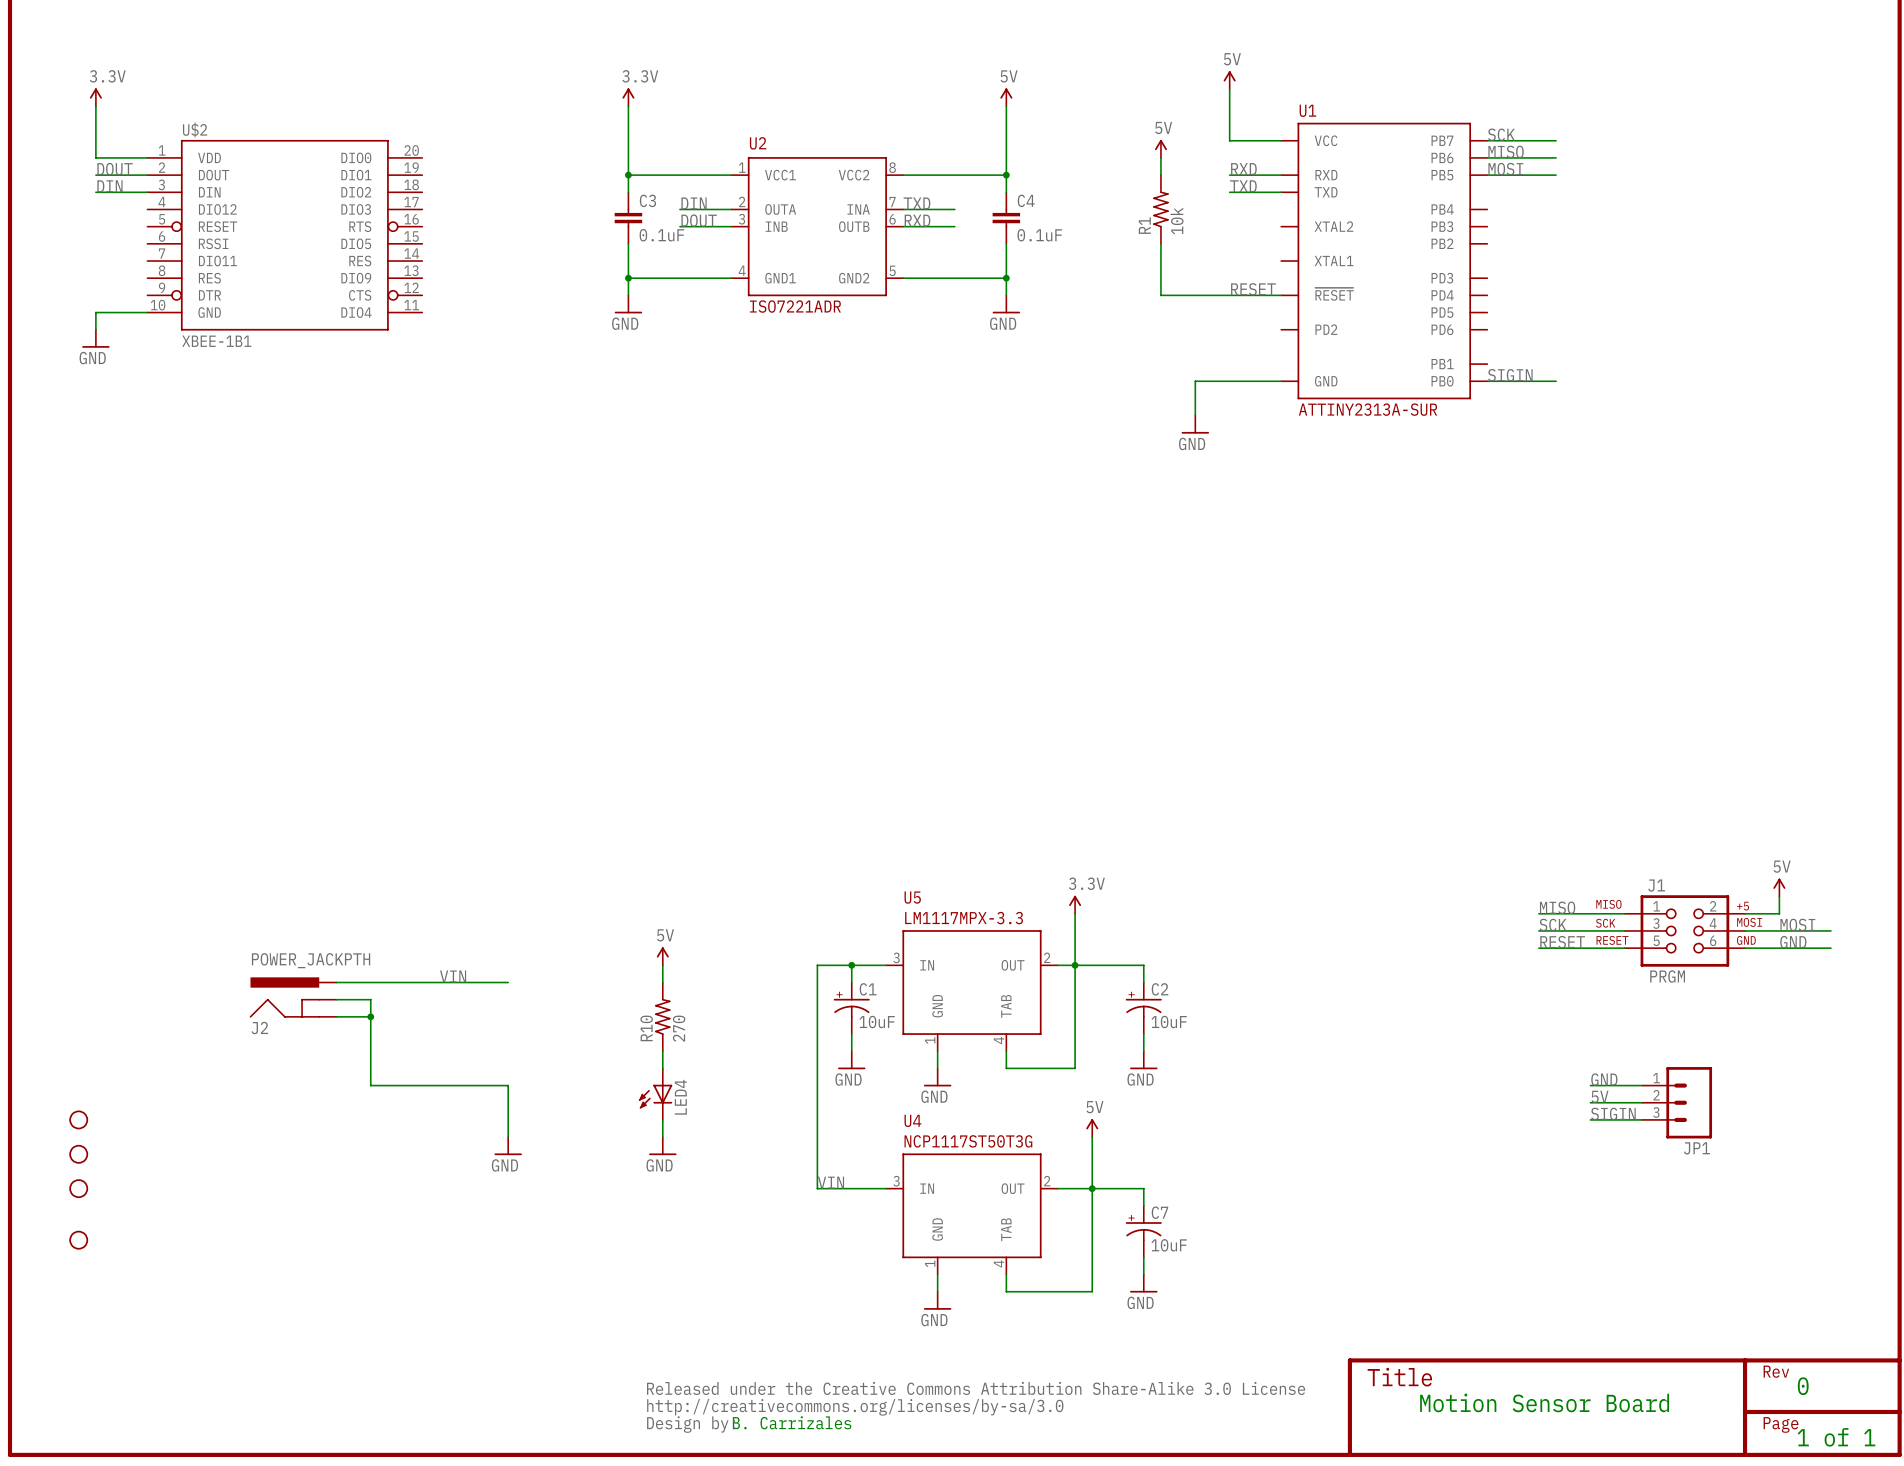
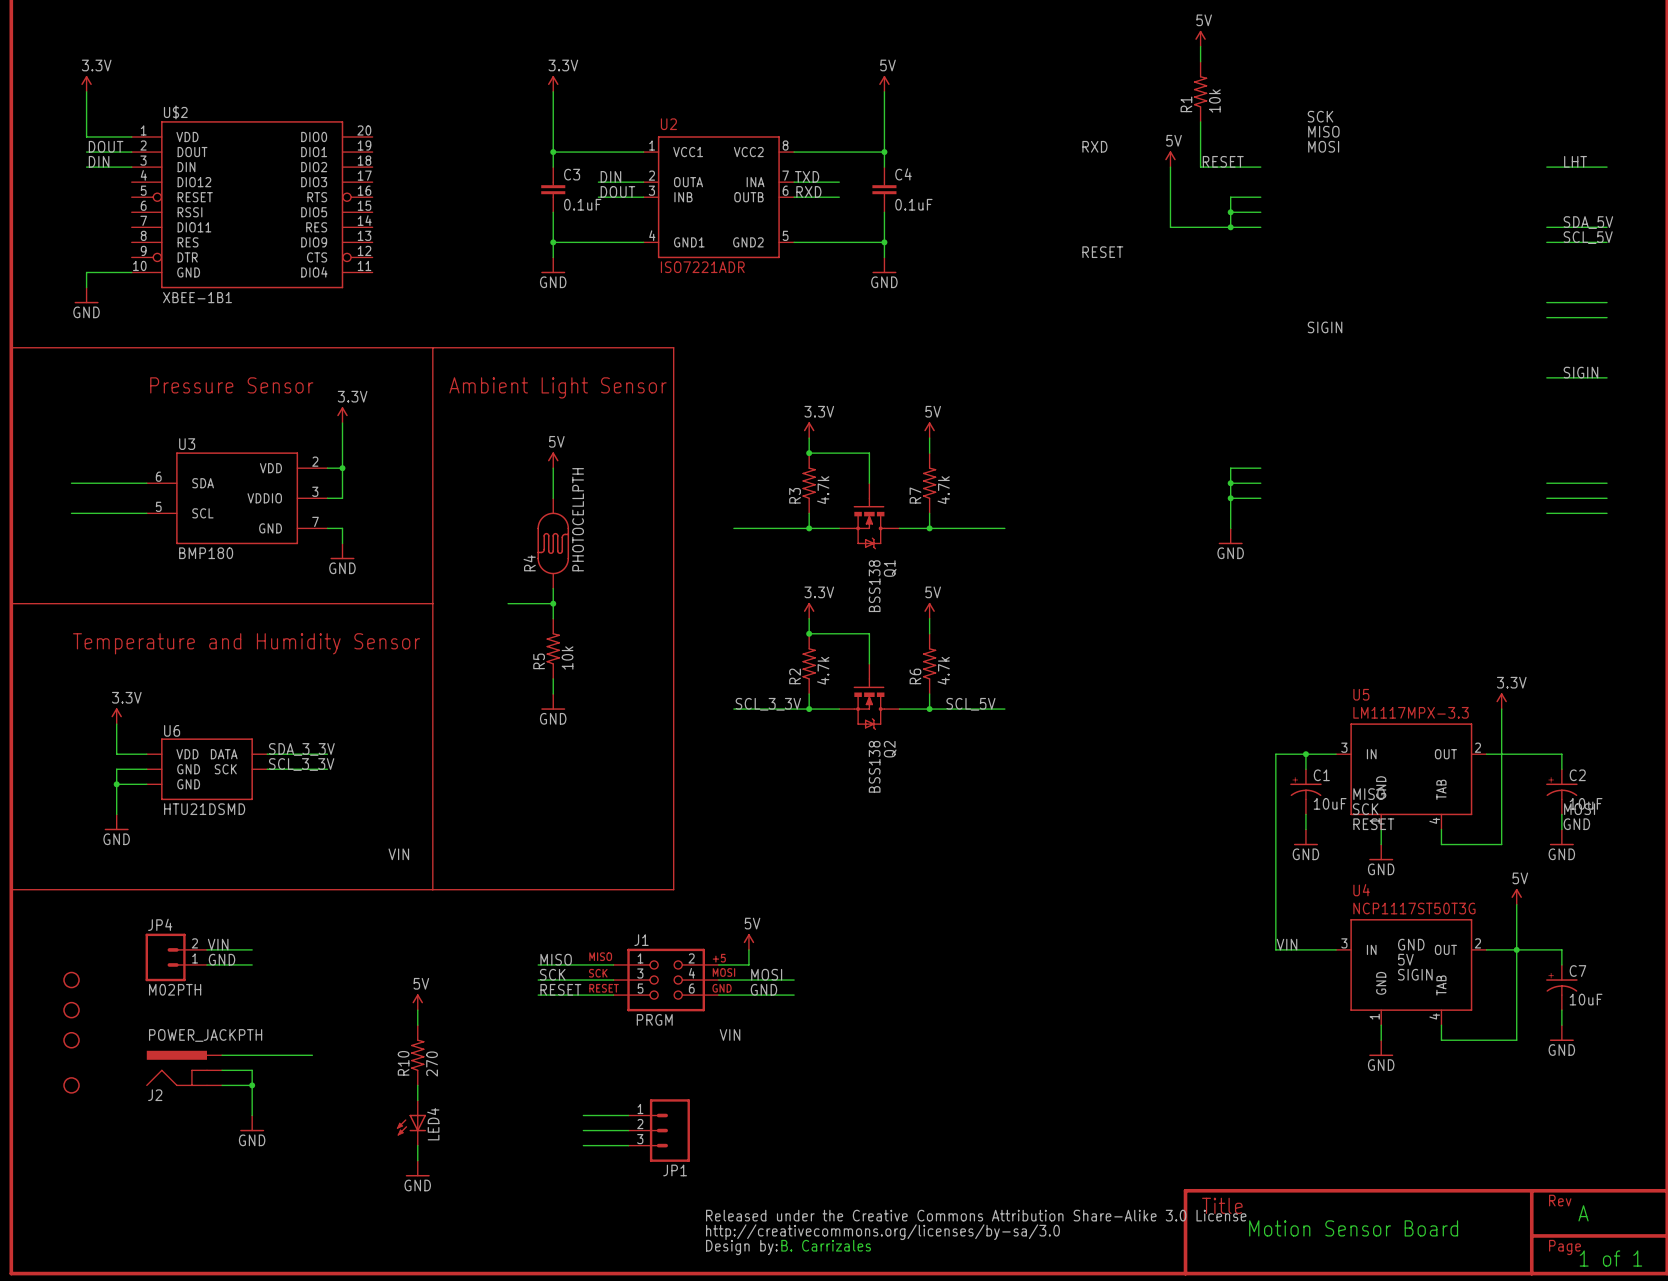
power symbol: none -> 5V (1200, 38)
wire: none -> (1200, 46) (1200, 61)
power symbol: 5V (1229, 80) -> none
wire: (1229, 89) (1229, 140) (1281, 140) -> none
wire: none -> (1200, 121) (1200, 167) (1260, 167)
wire: (1487, 140) (1556, 140) -> none
power symbol: 5V (1160, 148) -> none
wire: (1160, 157) (1160, 175) -> none
wire: (1487, 157) (1556, 157) -> none
wire: (1229, 175) (1281, 175) -> none
wire: (1487, 175) (1556, 175) -> none
power symbol: none -> 5V (1170, 159)
label: TXD (1243, 186) -> none
label: none -> RESET (1223, 161)
label: none -> LHT (1575, 161)
wire: (1229, 192) (1281, 192) -> none
wire: none -> (1170, 167) (1170, 227) (1260, 227)
wire: none -> (1546, 167) (1607, 167)
R1 position: (1160, 209) -> (1200, 91)
wire: none -> (1260, 197) (1230, 197) (1230, 227)
wire: (1160, 243) (1160, 295) (1281, 295) -> none
wire: none -> (1230, 212) (1260, 212)
junction: none -> (1230, 212)
label: none -> SDA_5V (1588, 222)
U1: ATTINY2313A-SUR (1384, 261) -> none
junction: none -> (1230, 227)
wire: none -> (1546, 227) (1607, 227)
label: none -> SCL_5V (1588, 237)
wire: none -> (1546, 242) (1607, 242)
wire: none -> (1546, 302) (1607, 302)
wire: none -> (1546, 317) (1607, 317)
wire: (1281, 381) (1195, 381) (1195, 415) -> none
wire: (1487, 381) (1556, 381) -> none
line: none -> (11, 347) (673, 347) (673, 889) (11, 889)
line: none -> (432, 347) (432, 889)
power symbol: GND (1195, 424) -> none
label: none -> SIGIN (1580, 372)
wire: none -> (1546, 377) (1607, 377)
text: none -> Pressure Sensor (231, 385)
text: none -> Ambient Light Sensor (558, 387)
power symbol: none -> 3.3V (342, 415)
wire: none -> (342, 423) (342, 498) (327, 498)
power symbol: none -> 3.3V (809, 430)
power symbol: none -> 5V (929, 430)
wire: none -> (809, 438) (809, 453) (869, 453) (869, 483)
wire: none -> (929, 438) (929, 453)
junction: none -> (809, 453)
power symbol: none -> 5V (553, 460)
wire: none -> (327, 468) (342, 468)
junction: none -> (342, 468)
wire: none -> (553, 468) (553, 498)
wire: none -> (1260, 468) (1230, 468) (1230, 528)
wire: none -> (71, 483) (146, 483)
R3: none -> 4.7k (809, 483)
R7: none -> 4.7k (929, 483)
wire: none -> (1230, 483) (1260, 483)
junction: none -> (1230, 483)
wire: none -> (1546, 483) (1607, 483)
U3: none -> BMP180 (237, 498)
wire: none -> (1230, 498) (1260, 498)
junction: none -> (1230, 498)
wire: none -> (1546, 498) (1607, 498)
wire: none -> (71, 513) (146, 513)
wire: none -> (809, 513) (809, 528)
wire: none -> (929, 513) (929, 528)
wire: none -> (1546, 513) (1607, 513)
Q1: none -> BSS138 (869, 516)
wire: none -> (327, 528) (342, 528) (342, 543)
wire: none -> (733, 528) (839, 528)
junction: none -> (809, 528)
wire: none -> (899, 528) (1004, 528)
junction: none -> (929, 528)
power symbol: none -> GND (1230, 536)
R4: none -> PHOTOCELLPTH (553, 543)
power symbol: none -> GND (342, 551)
wire: none -> (553, 588) (553, 618)
line: none -> (11, 603) (432, 603)
wire: none -> (508, 603) (553, 603)
junction: none -> (553, 603)
power symbol: none -> 3.3V (809, 610)
power symbol: none -> 5V (929, 610)
wire: none -> (809, 618) (809, 633) (869, 633) (869, 663)
wire: none -> (929, 618) (929, 633)
junction: none -> (809, 633)
text: none -> Temperature and Humidity Sensor (246, 643)
R5: none -> 10k (553, 648)
R2: none -> 4.7k (809, 663)
R6: none -> 4.7k (929, 663)
wire: none -> (553, 678) (553, 693)
wire: none -> (809, 693) (809, 709)
wire: none -> (929, 693) (929, 709)
Q2: none -> BSS138 (869, 696)
power symbol: none -> 3.3V (1501, 701)
power symbol: none -> GND (553, 701)
label: none -> SCL_3_3V (768, 704)
label: none -> SCL_5V (970, 704)
wire: none -> (733, 709) (839, 709)
junction: none -> (809, 709)
wire: none -> (899, 709) (1004, 709)
junction: none -> (929, 709)
wire: none -> (1501, 709) (1501, 844) (1441, 844) (1441, 829)
power symbol: none -> 3.3V (116, 716)
wire: none -> (116, 724) (116, 754) (146, 754)
label: none -> SDA_3_3V (301, 749)
wire: none -> (267, 754) (327, 754)
wire: none -> (1305, 754) (1305, 769)
junction: none -> (1305, 754)
wire: none -> (1336, 754) (1275, 754) (1275, 949) (1336, 949)
wire: none -> (1486, 754) (1561, 754) (1561, 769)
label: none -> SCL_3_3V (301, 764)
wire: none -> (146, 769) (116, 769) (116, 814)
U6: none -> HTU21DSMD (207, 769)
wire: none -> (267, 769) (327, 769)
power symbol position: 5V (1779, 887) -> 5V (1516, 896)
wire: none -> (116, 784) (146, 784)
junction: none -> (116, 784)
wire: (1779, 896) (1779, 913) (1745, 913) -> none
power symbol: 3.3V (1075, 904) -> none
wire: (1075, 913) (1075, 1068) (1006, 1068) (1006, 1051) -> none
wire: (1538, 913) (1624, 913) -> none
wire: none -> (1305, 814) (1305, 829)
J1 position: (1684, 930) -> (666, 980)
wire: (1745, 930) (1830, 930) -> none
wire: none -> (1561, 814) (1561, 829)
power symbol: none -> GND (116, 822)
wire: (1538, 948) (1624, 948) -> none
wire: none -> (1381, 829) (1381, 844)
wire: (1745, 948) (1830, 948) -> none
power symbol: 5V (662, 956) -> none
power symbol: none -> GND (1305, 837)
power symbol: none -> GND (1561, 837)
wire: (662, 965) (662, 982) -> none
wire: (851, 965) (851, 982) -> none
junction: (851, 965) -> none
wire: (886, 965) (817, 965) (817, 1188) (886, 1188) -> none
wire: (1057, 965) (1143, 965) (1143, 982) -> none
junction: (1075, 965) -> none
power symbol: none -> GND (1381, 852)
wire: (336, 982) (508, 982) -> none
U5 position: (972, 990) -> (1411, 776)
J2 position: (293, 997) -> (184, 1068)
wire: (336, 999) (370, 999) (370, 1085) (508, 1085) (508, 1137) -> none
C1 position: (851, 1008) -> (1305, 791)
C2 position: (1143, 1008) -> (1561, 791)
junction: (370, 1016) -> none
R10 position: (662, 1016) -> (417, 1055)
wire: (851, 1034) (851, 1051) -> none
wire: (1143, 1034) (1143, 1051) -> none
wire: none -> (1516, 904) (1516, 1040) (1441, 1040) (1441, 1025)
wire: (662, 1051) (662, 1068) -> none
wire: (937, 1051) (937, 1068) -> none
power symbol: GND (851, 1060) -> none
power symbol: GND (1143, 1060) -> none
power symbol: none -> 5V (748, 942)
power symbol: GND (937, 1077) -> none
label: none -> VIN (218, 944)
label: none -> VIN (1287, 944)
wire: none -> (207, 949) (252, 949)
wire: none -> (748, 949) (748, 964) (718, 964)
wire: (1590, 1085) (1641, 1085) -> none
wire: none -> (1486, 949) (1561, 949) (1561, 964)
junction: none -> (1516, 949)
JP4: none -> M02PTH (176, 957)
LED4 position: (655, 1094) -> (411, 1123)
label: none -> GND (222, 959)
label: none -> MISO (556, 959)
wire: none -> (207, 964) (252, 964)
wire: none -> (538, 964) (613, 964)
wire: (1590, 1102) (1641, 1102) -> none
JP1 position: (1677, 1102) -> (659, 1130)
label: none -> SCK (552, 974)
label: none -> MOSI (766, 974)
wire: none -> (538, 980) (613, 980)
wire: (662, 1119) (662, 1137) -> none
wire: none -> (718, 980) (794, 980)
wire: (1590, 1119) (1641, 1119) -> none
power symbol: 5V (1092, 1128) -> none
label: none -> RESET (560, 989)
label: none -> GND (763, 989)
wire: none -> (538, 995) (613, 995)
wire: none -> (718, 995) (794, 995)
wire: (1092, 1137) (1092, 1291) (1006, 1291) (1006, 1274) -> none
power symbol: none -> 5V (417, 1002)
power symbol: GND (508, 1146) -> none
power symbol: GND (662, 1146) -> none
wire: none -> (417, 1010) (417, 1025)
wire: none -> (1561, 1010) (1561, 1025)
wire: none -> (1381, 1025) (1381, 1040)
power symbol: none -> GND (1561, 1033)
wire: (1057, 1188) (1143, 1188) (1143, 1205) -> none
junction: (1092, 1188) -> none
power symbol: none -> GND (1381, 1048)
wire: none -> (222, 1055) (312, 1055)
U4 position: (972, 1213) -> (1411, 972)
wire: none -> (222, 1070) (252, 1070) (252, 1115)
C7 position: (1143, 1231) -> (1561, 987)
wire: none -> (222, 1085) (252, 1085)
junction: none -> (252, 1085)
wire: none -> (417, 1085) (417, 1100)
wire: (1143, 1257) (1143, 1274) -> none
wire: none -> (583, 1115) (628, 1115)
wire: (937, 1274) (937, 1291) -> none
power symbol: none -> GND (252, 1123)
power symbol: GND (1143, 1283) -> none
wire: none -> (583, 1130) (628, 1130)
power symbol: GND (937, 1300) -> none
wire: none -> (417, 1145) (417, 1160)
wire: none -> (583, 1145) (628, 1145)
power symbol: none -> GND (417, 1168)
text: 0 (1803, 1386) -> A (1583, 1213)
part position: (976, 1407) -> (976, 1232)
text position: B. Carrizales (792, 1422) -> B. Carrizales (826, 1245)

